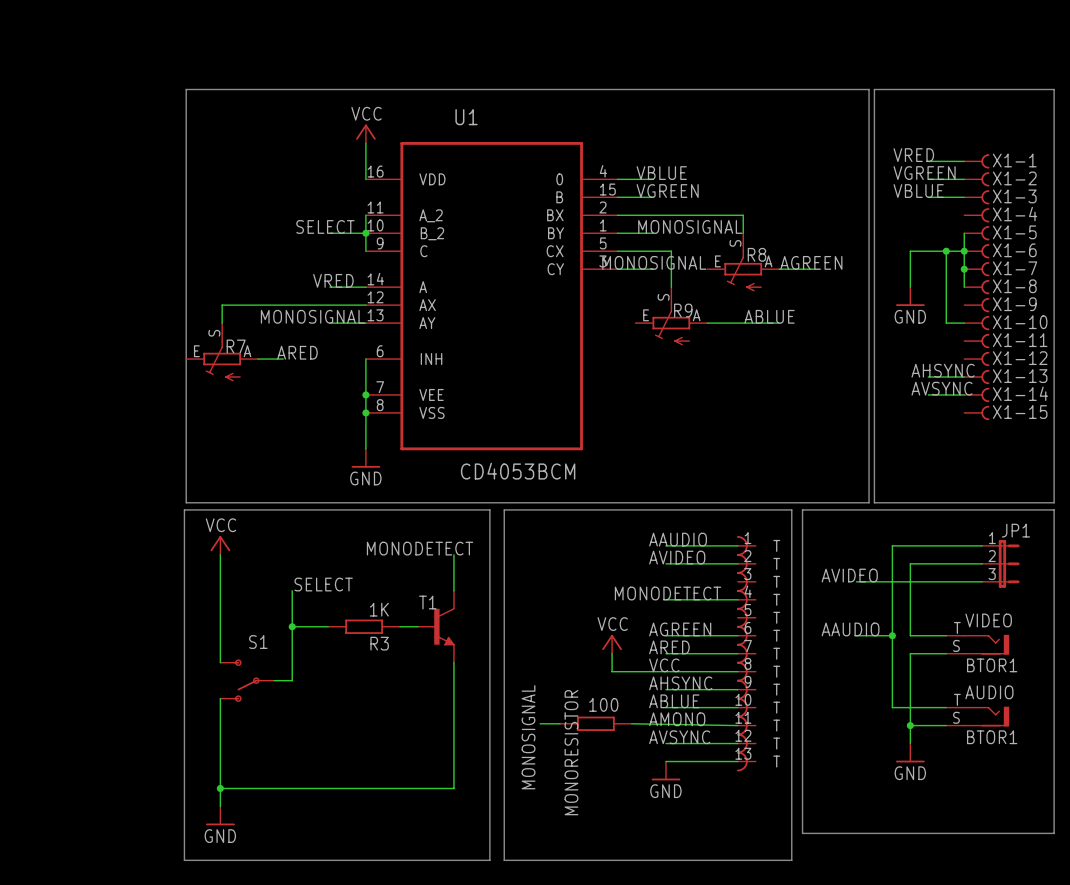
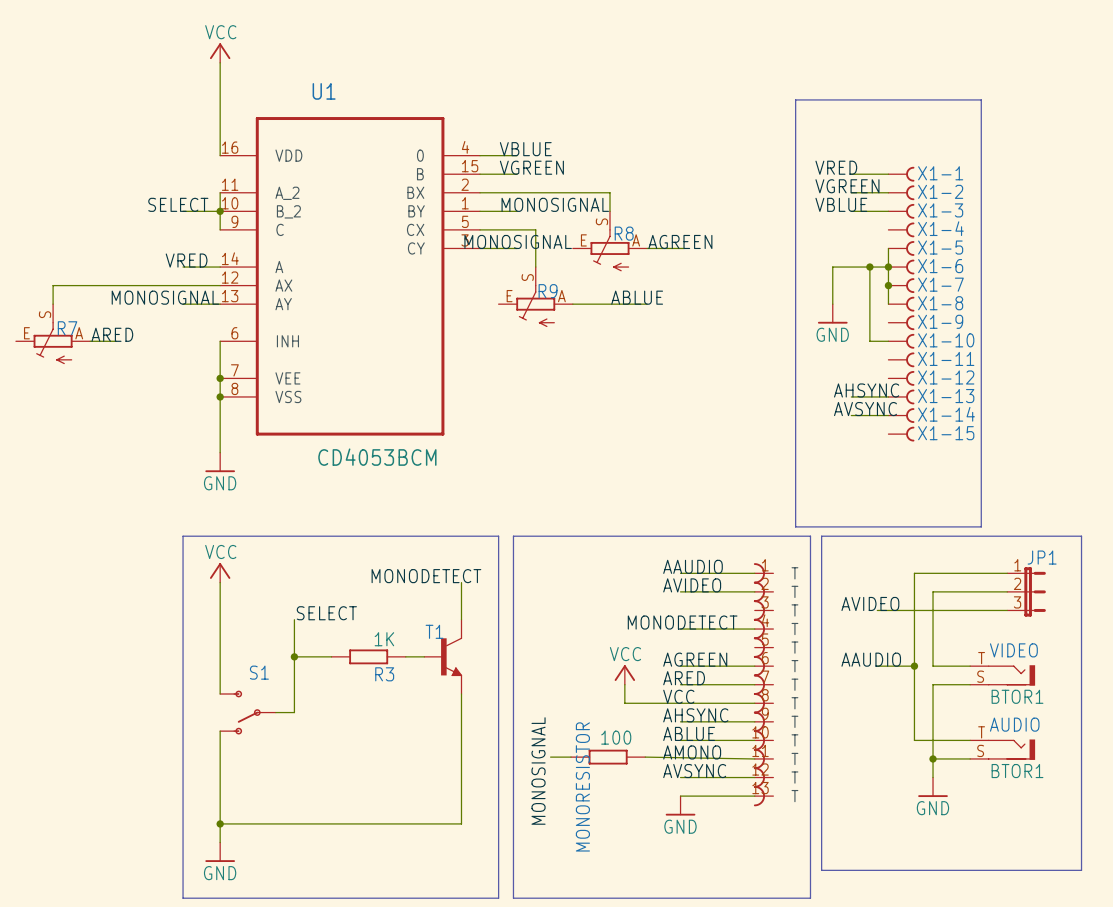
wire: none -> (220, 62) (220, 155)
line: (186, 89) (869, 89) (869, 502) (186, 502) (186, 89) -> none
line: (874, 89) (874, 502) (1054, 502) (1054, 89) (874, 89) -> (795, 99) (795, 526) (981, 526) (981, 99) (795, 99)
power symbol position: VCC (365, 133) -> VCC (220, 53)
label: none -> VBLUE (525, 149)
wire: (365, 143) (365, 179) -> none
label: none -> VGREEN (531, 167)
label position: VRED (913, 155) -> VRED (836, 167)
wire: (928, 161) (964, 161) -> (851, 174) (888, 174)
X1-1 position: (976, 161) -> (901, 174)
label: none -> VGREEN (847, 186)
label: VBLUE (661, 173) -> none
label: VGREEN (924, 173) -> none
wire: (617, 179) (653, 179) -> (480, 155) (517, 155)
wire: (928, 179) (964, 179) -> (851, 192) (888, 192)
X1-2 position: (976, 179) -> (901, 192)
label: none -> MONOSIGNAL (555, 204)
label: none -> VBLUE (841, 204)
label: VGREEN (667, 191) -> none
label: VBLUE (918, 191) -> none
junction: none -> (220, 211)
wire: (617, 197) (653, 197) -> (480, 174) (517, 174)
wire: (928, 197) (964, 197) -> (851, 211) (888, 211)
X1-3 position: (976, 197) -> (901, 211)
wire: (365, 215) (365, 251) -> (220, 192) (220, 229)
wire: (617, 215) (743, 215) (743, 233) -> (480, 192) (610, 192) (610, 211)
X1-4 position: (976, 215) -> (901, 229)
label: none -> MONOSIGNAL (518, 241)
label position: SELECT (325, 226) -> SELECT (178, 204)
label: MONOSIGNAL (690, 226) -> none
wire: (329, 233) (365, 233) -> (183, 211) (220, 211)
junction: (365, 233) -> none
wire: (617, 233) (653, 233) -> (480, 211) (517, 211)
wire: (964, 233) (964, 287) -> (888, 248) (888, 304)
X1-5 position: (976, 233) -> (901, 248)
junction: none -> (869, 267)
junction: none -> (888, 267)
wire: (617, 251) (671, 251) (671, 287) -> (480, 229) (535, 229) (535, 267)
wire: (946, 251) (946, 323) (964, 323) -> (869, 267) (869, 341) (888, 341)
junction: (946, 251) -> none
wire: (964, 251) (910, 251) (910, 287) -> (888, 267) (832, 267) (832, 304)
junction: (964, 251) -> none
X1-6 position: (976, 251) -> (901, 267)
label: MONOSIGNAL (654, 262) -> none
R8 position: (743, 262) -> (610, 241)
label position: AGREEN (811, 262) -> AGREEN (680, 241)
wire: none -> (220, 285) (53, 285) (53, 304)
junction: none -> (888, 285)
wire: (617, 269) (653, 269) -> (480, 248) (517, 248)
wire: (779, 269) (815, 269) -> (647, 248) (684, 248)
junction: (964, 269) -> none
X1-7 position: (976, 269) -> (901, 285)
label: none -> MONOSIGNAL (165, 297)
label position: VRED (333, 280) -> VRED (186, 260)
wire: (329, 287) (365, 287) -> (183, 267) (220, 267)
X1-8 position: (976, 287) -> (901, 304)
U1 position: (491, 296) -> (350, 276)
power symbol position: GND (910, 296) -> GND (832, 313)
wire: (365, 305) (222, 305) (222, 323) -> none
X1-9 position: (976, 305) -> (901, 322)
label: none -> ARED (112, 334)
label: MONOSIGNAL (312, 316) -> none
R9 position: (671, 316) -> (535, 297)
label position: ABLUE (769, 316) -> ABLUE (637, 297)
wire: none -> (220, 341) (220, 452)
wire: (329, 323) (365, 323) -> (183, 304) (220, 304)
wire: (707, 323) (779, 323) -> (572, 304) (647, 304)
X1-10 position: (976, 323) -> (901, 341)
X1-11 position: (976, 341) -> (901, 359)
R7 position: (222, 352) -> (53, 334)
label: ARED (297, 352) -> none
junction: none -> (220, 378)
wire: (258, 359) (283, 359) -> (90, 341) (116, 341)
wire: (365, 359) (365, 448) -> none
X1-12 position: (976, 359) -> (901, 378)
label position: AHSYNC (943, 370) -> AHSYNC (866, 390)
junction: none -> (220, 396)
wire: (928, 377) (964, 377) -> (851, 396) (888, 396)
X1-13 position: (976, 377) -> (901, 396)
label position: AVSYNC (942, 388) -> AVSYNC (865, 409)
junction: (365, 394) -> none
wire: (928, 394) (964, 394) -> (851, 415) (888, 415)
X1-14 position: (976, 394) -> (901, 415)
junction: (365, 412) -> none
X1-15 position: (976, 412) -> (901, 434)
power symbol position: GND (365, 458) -> GND (220, 462)

